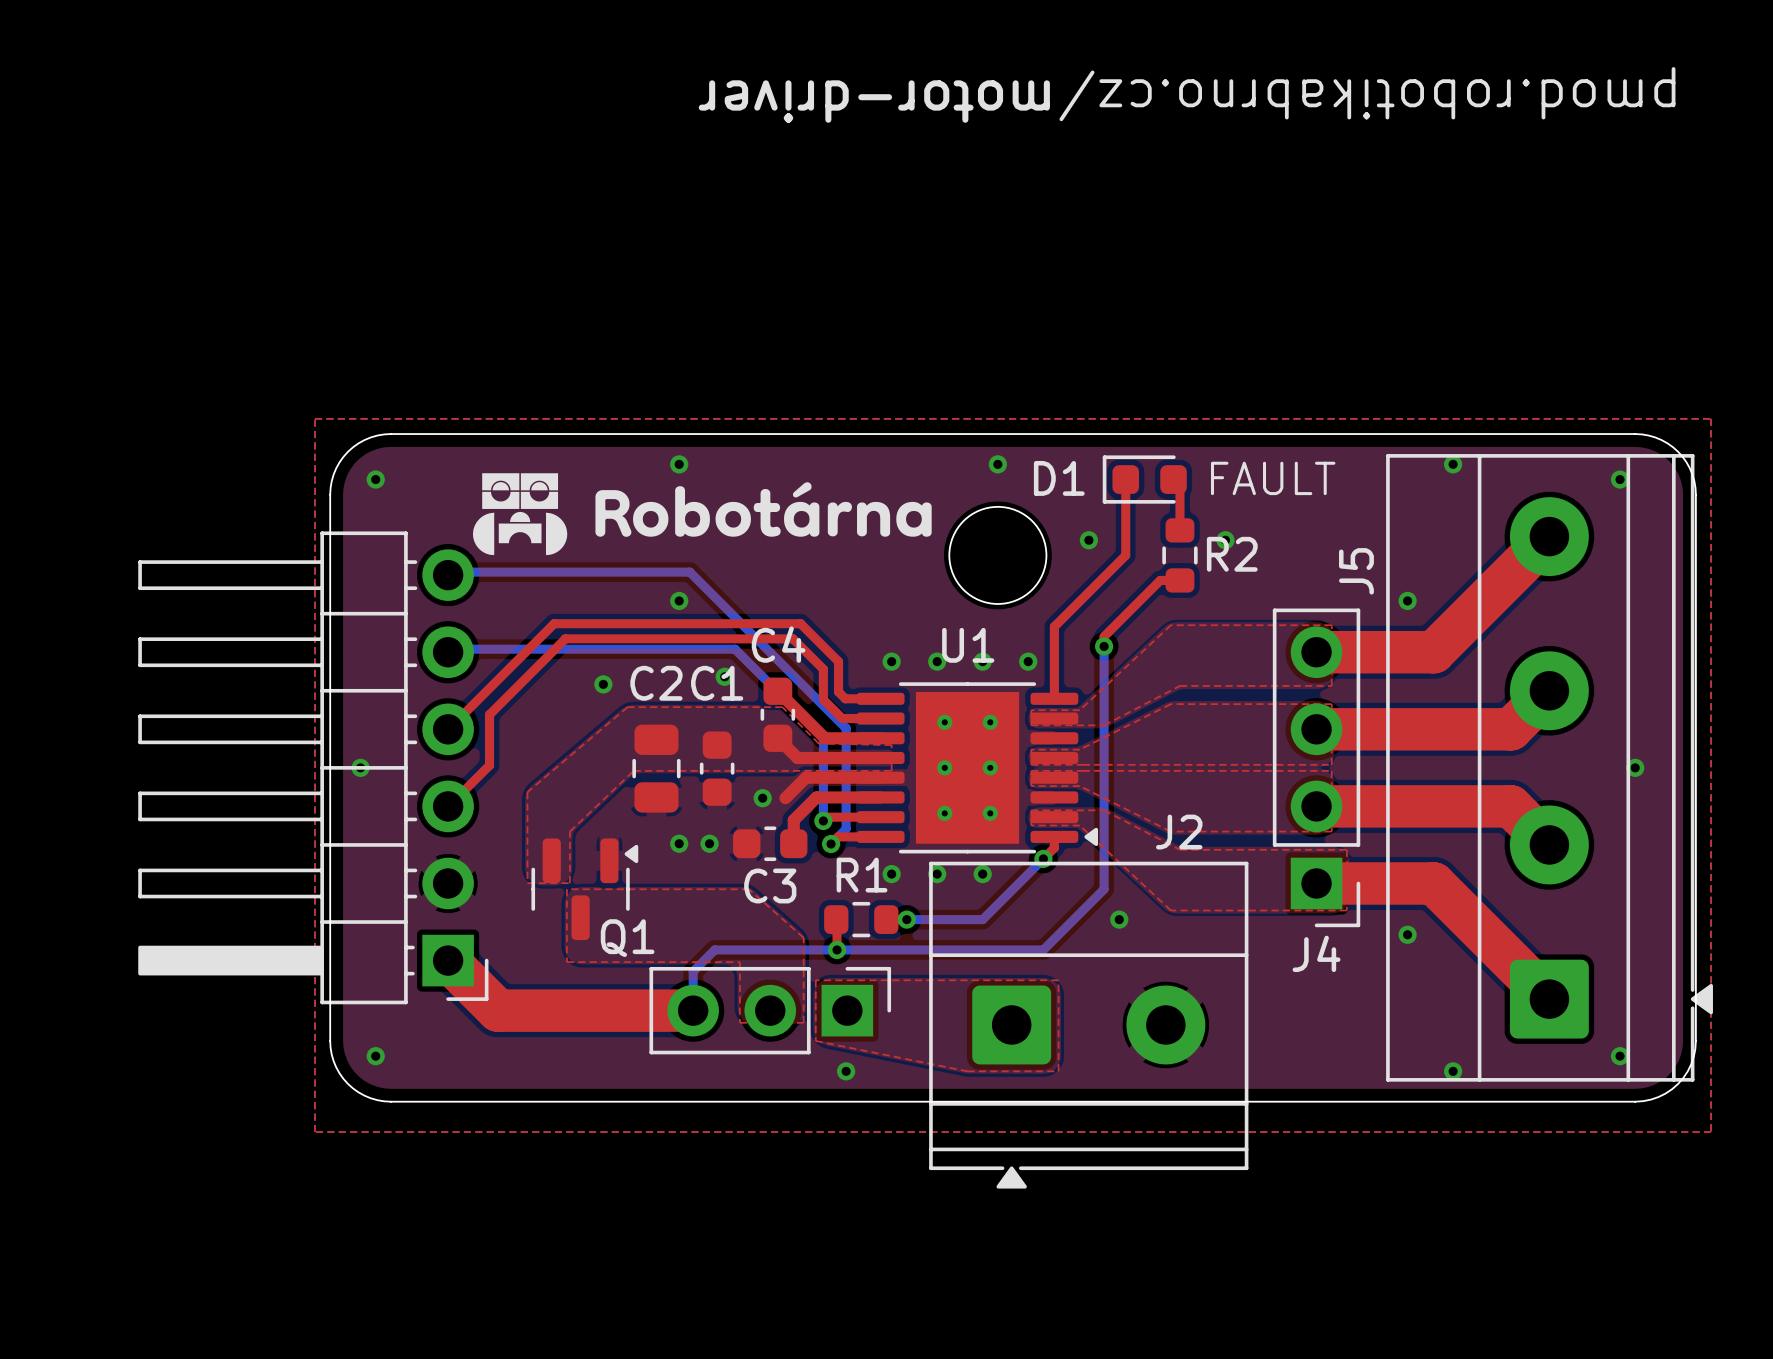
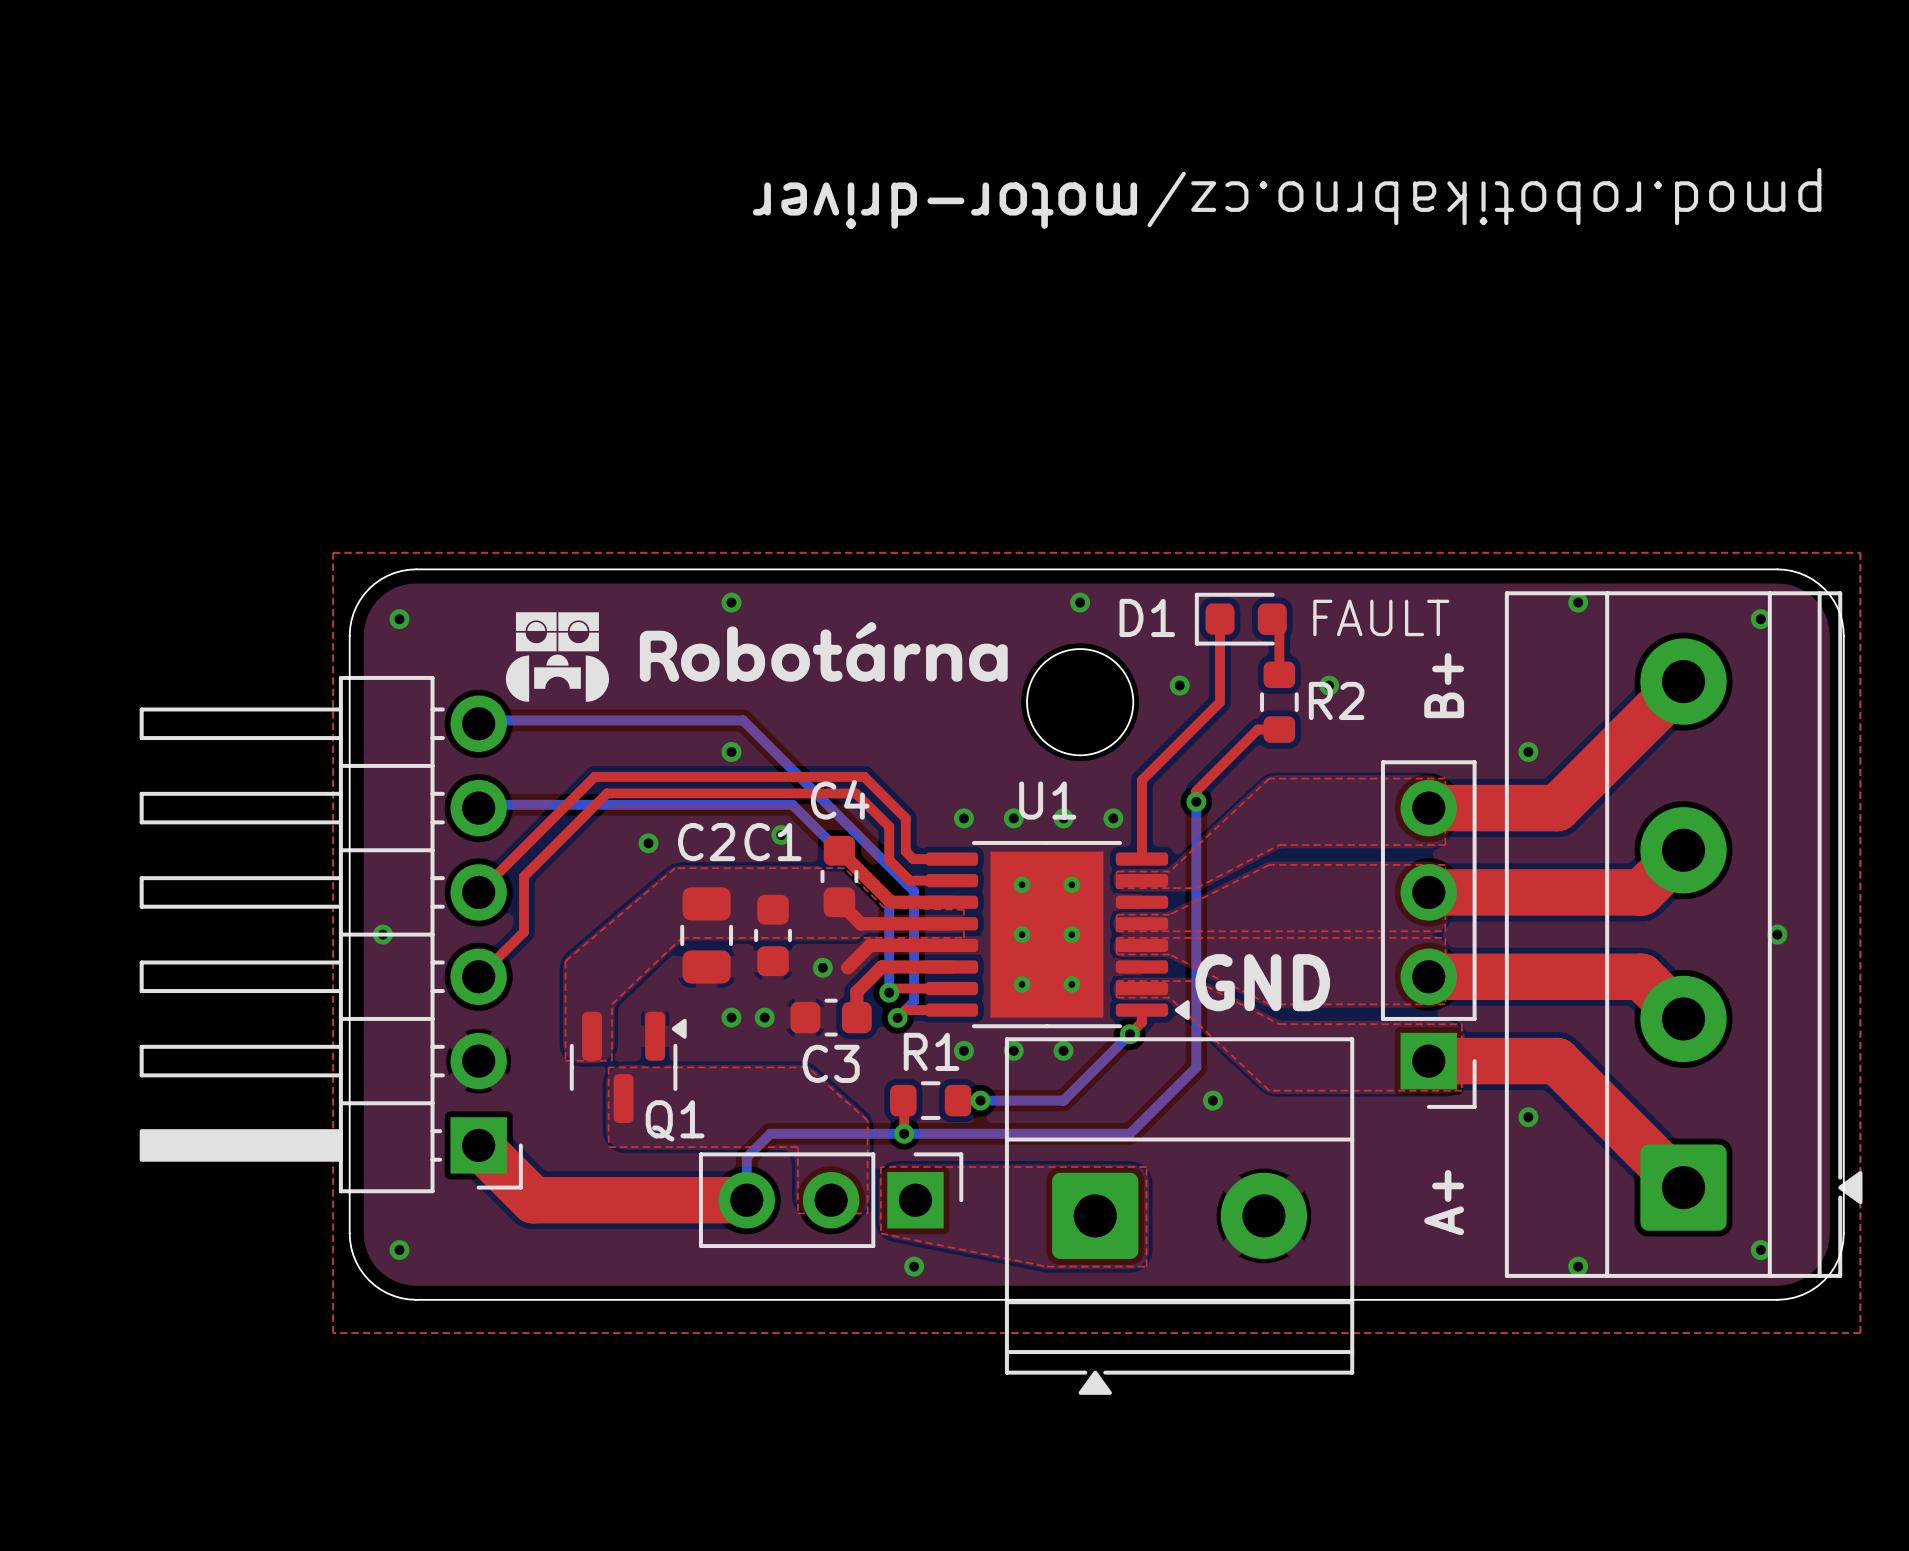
text: none -> B+ (1444, 685)
J5 name: J5 (1356, 571) -> none
text: none -> GND (1262, 982)
J2 name: J2 (1179, 832) -> none
J4 name: J4 (1316, 953) -> none
text: none -> A+ (1444, 1202)

